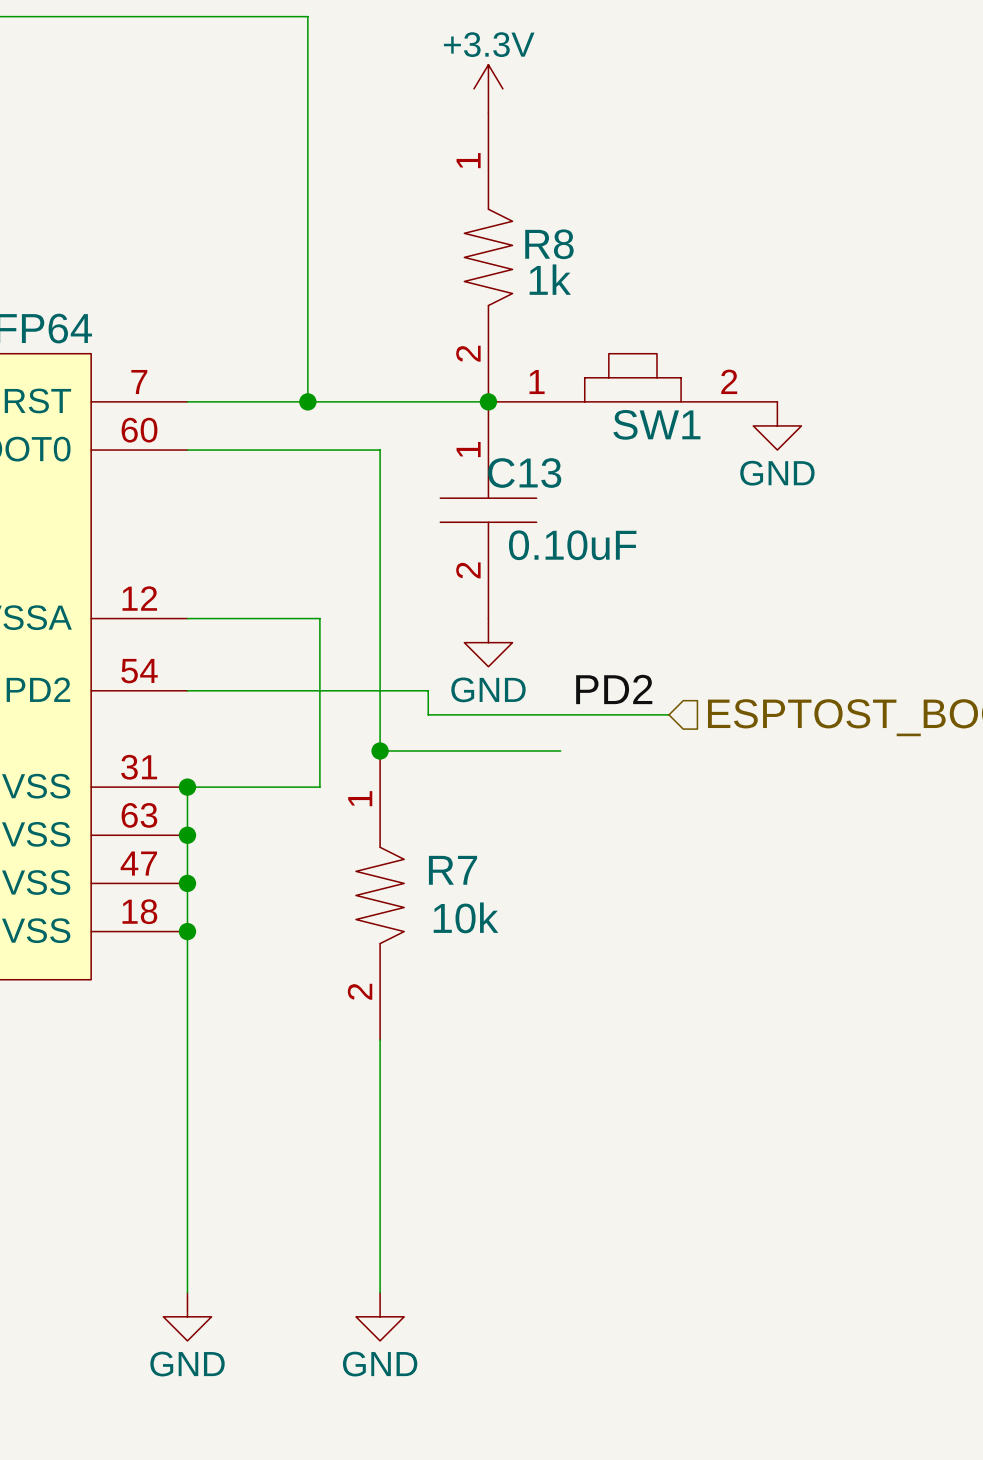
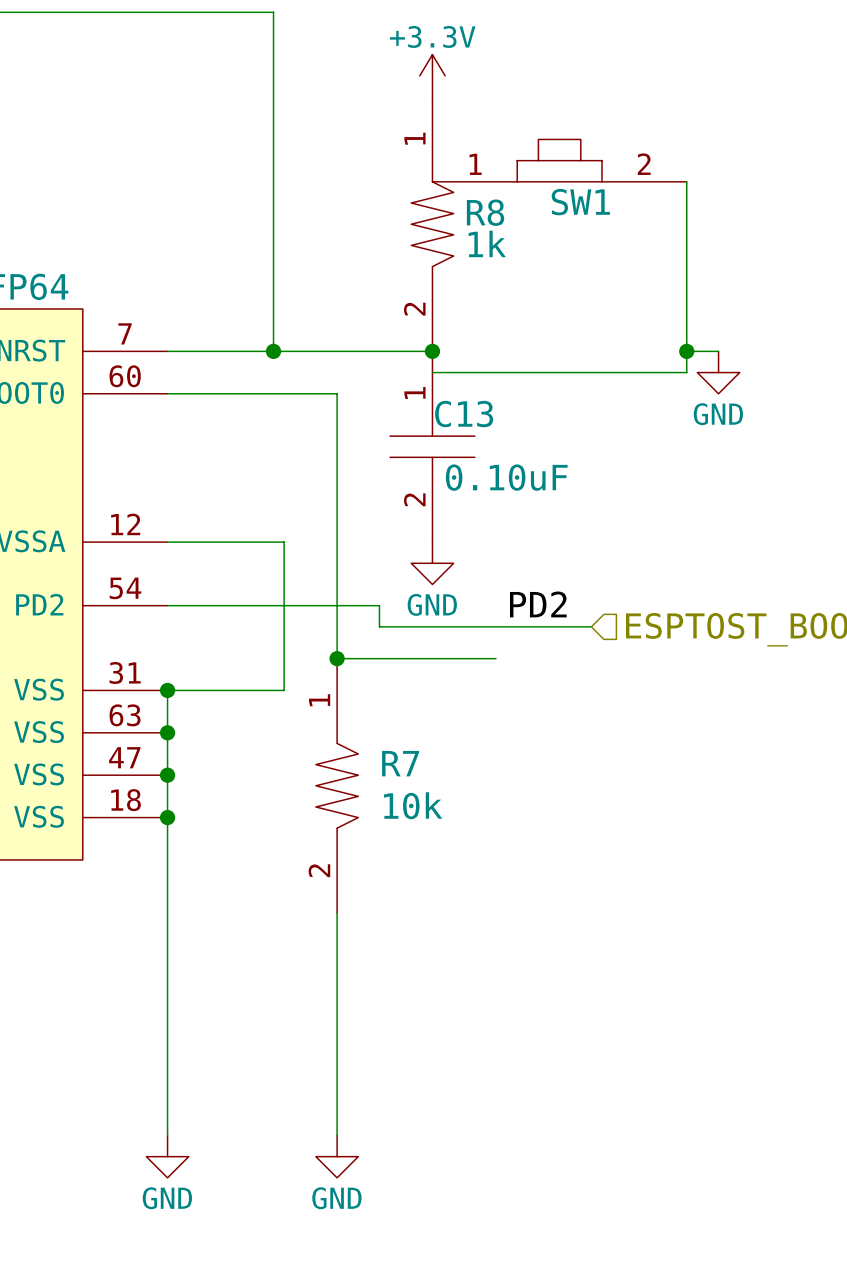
wire: none -> (686, 181) (686, 372) (432, 372)
SW1 position: (632, 377) -> (559, 160)
wire: none -> (686, 351) (718, 351)
junction: none -> (686, 351)
power symbol position: GND (777, 425) -> GND (718, 372)

